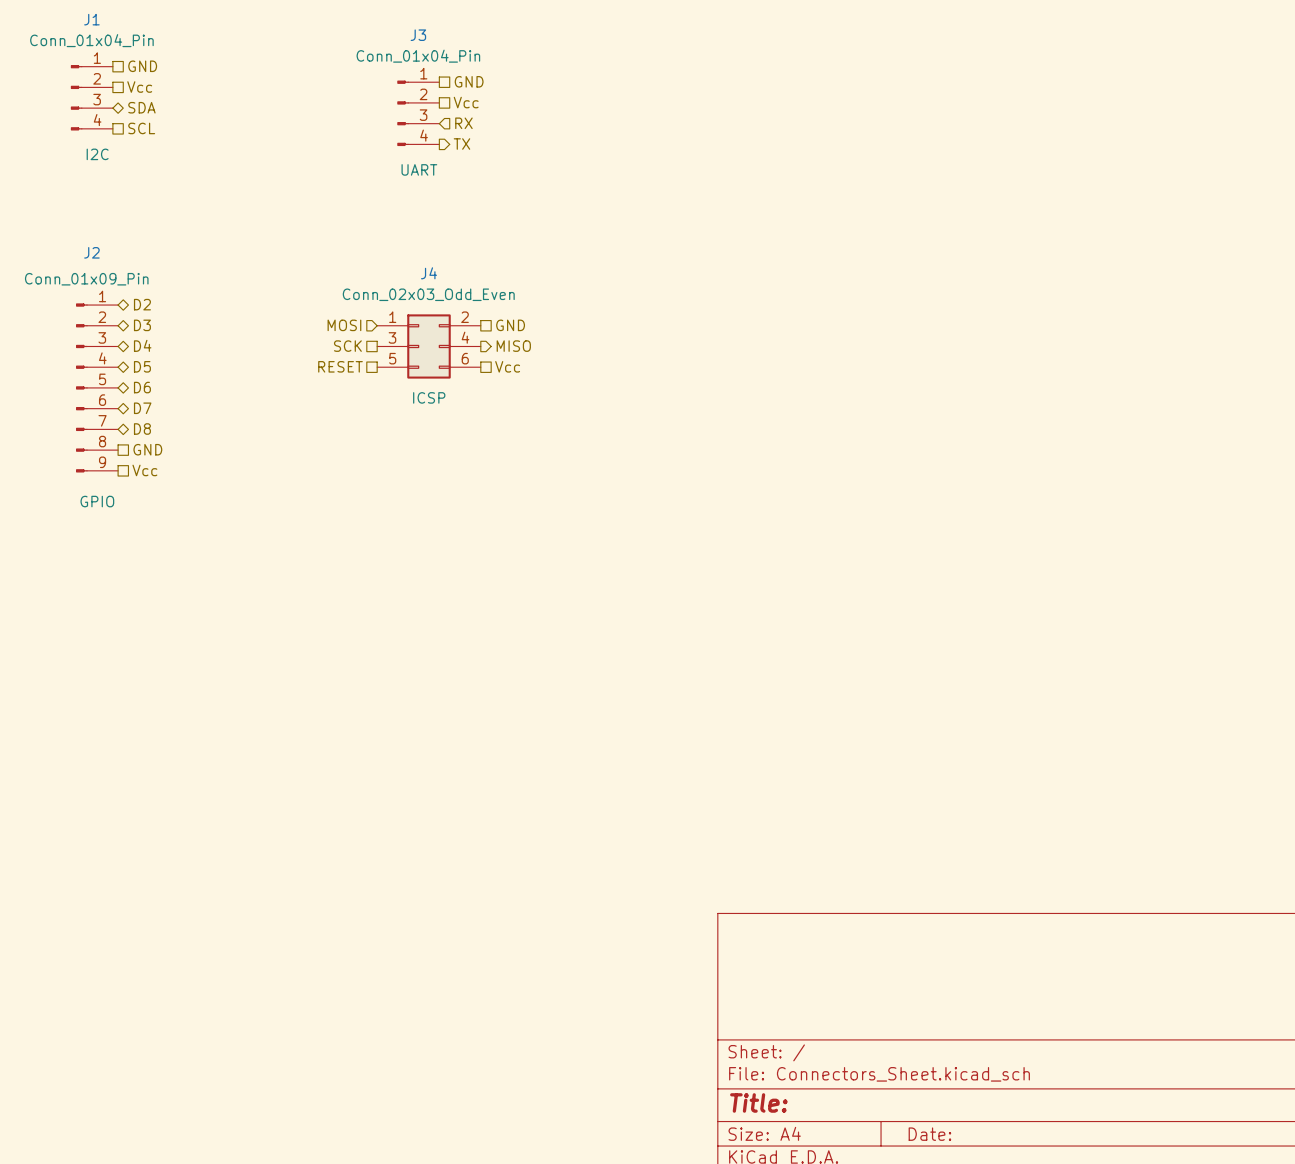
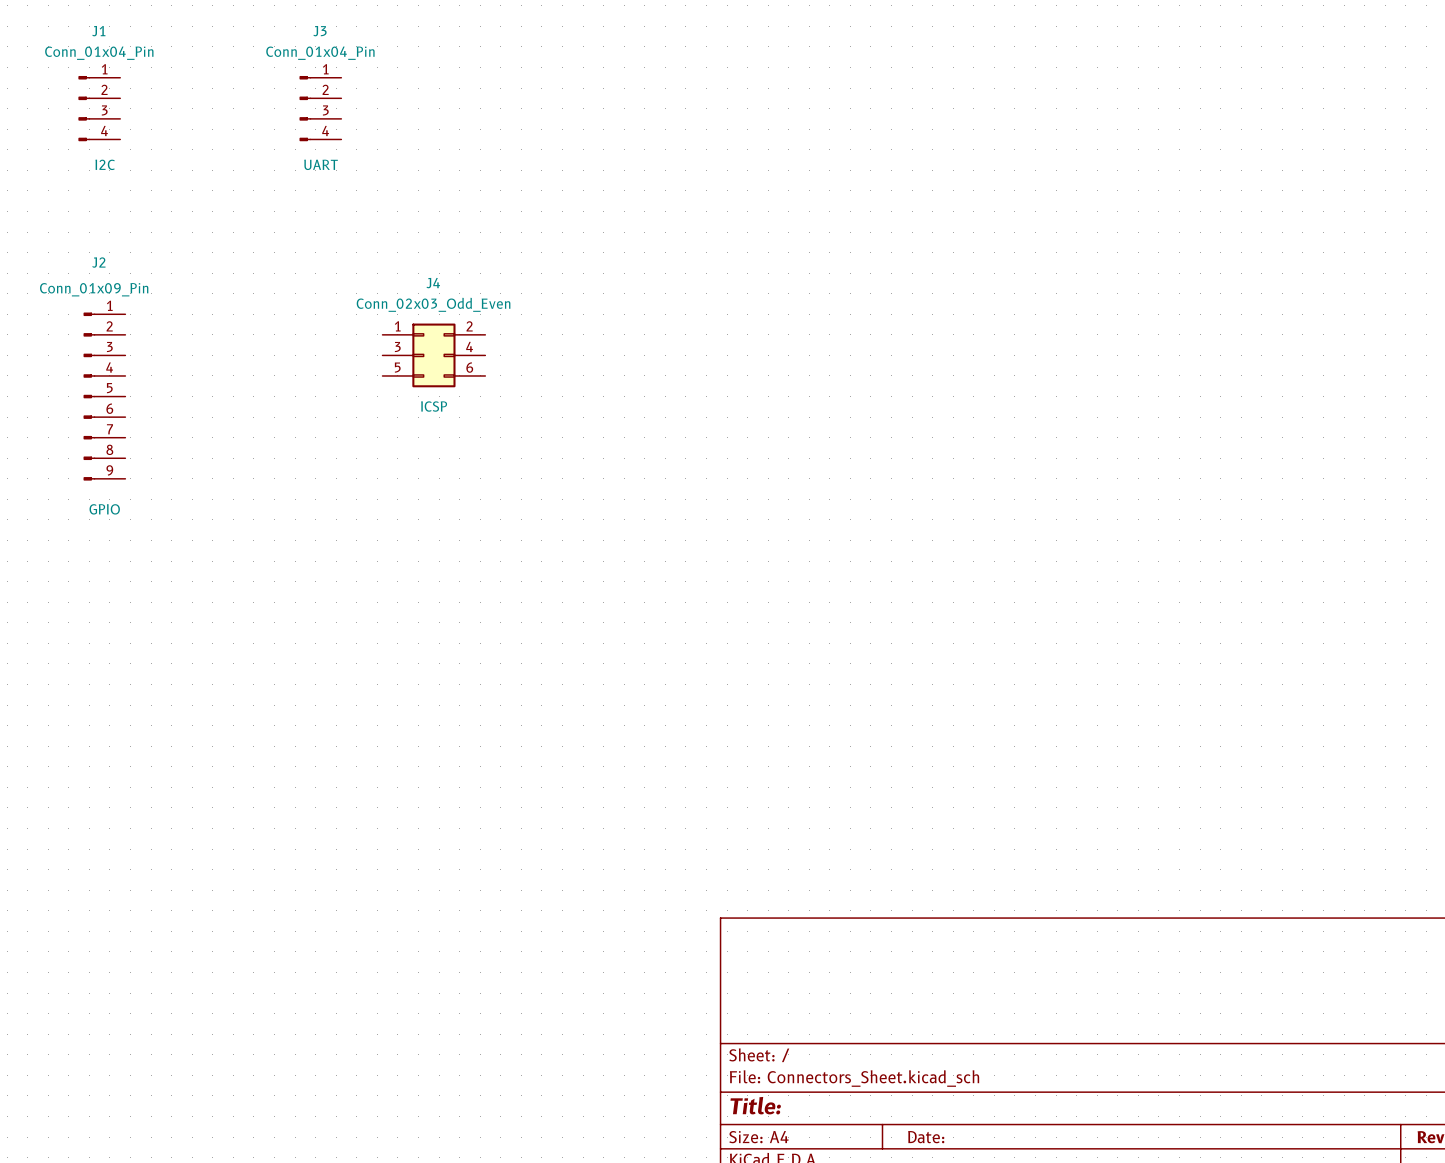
hierarchical label: GND (142, 66) -> none
hierarchical label: GND (469, 81) -> none
hierarchical label: Vcc (139, 87) -> none
hierarchical label: Vcc (466, 102) -> none
hierarchical label: SDA (141, 107) -> none
J3 position: (418, 113) -> (320, 108)
hierarchical label: RX (463, 123) -> none
hierarchical label: SCL (141, 128) -> none
hierarchical label: TX (461, 144) -> none
hierarchical label: D2 (142, 304) -> none
hierarchical label: D3 (142, 325) -> none
hierarchical label: MOSI (344, 325) -> none
hierarchical label: GND (510, 325) -> none
hierarchical label: D4 (142, 345) -> none
hierarchical label: SCK (347, 346) -> none
hierarchical label: MISO (513, 346) -> none
hierarchical label: D5 (142, 366) -> none
hierarchical label: RESET (340, 366) -> none
hierarchical label: Vcc (507, 366) -> none
hierarchical label: D6 (142, 387) -> none
hierarchical label: D7 (142, 408) -> none
hierarchical label: D8 (142, 429) -> none
hierarchical label: GND (147, 449) -> none
hierarchical label: Vcc (144, 470) -> none

